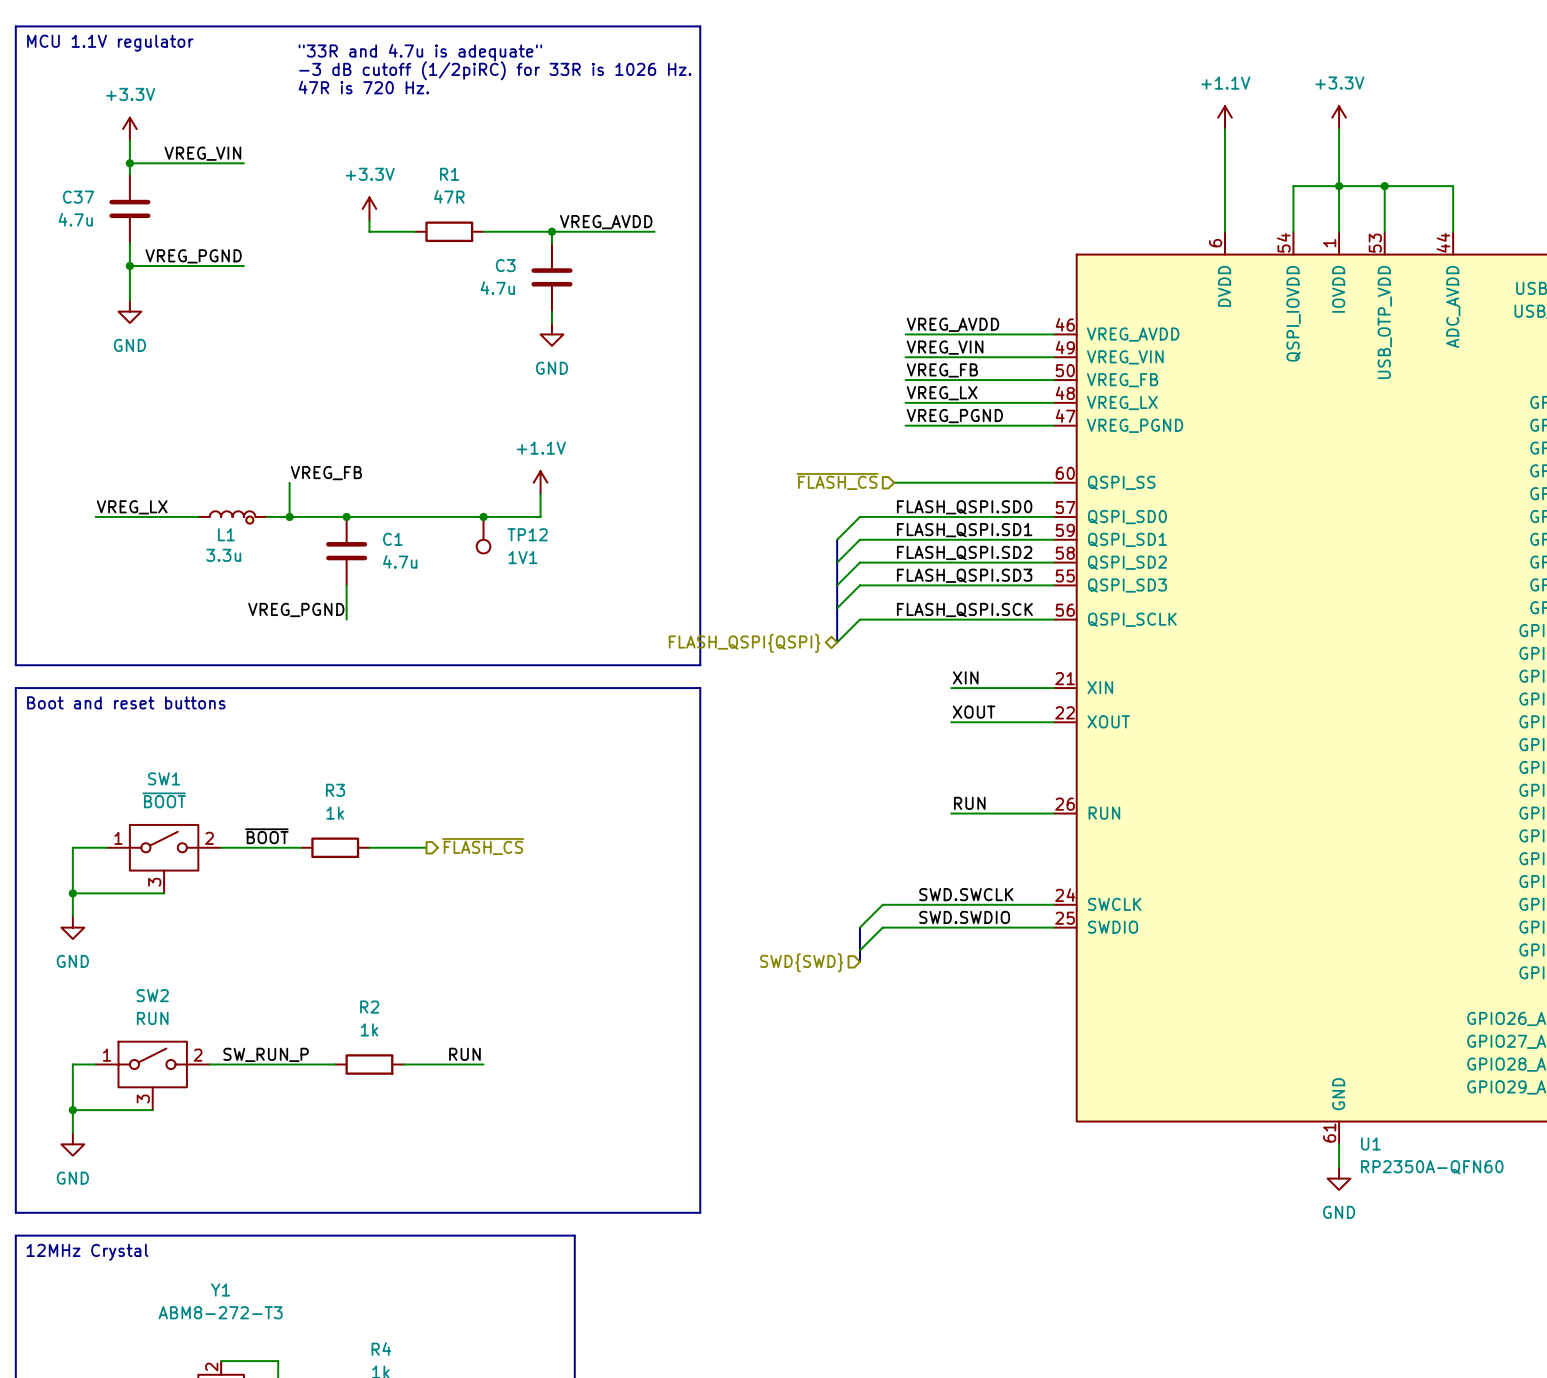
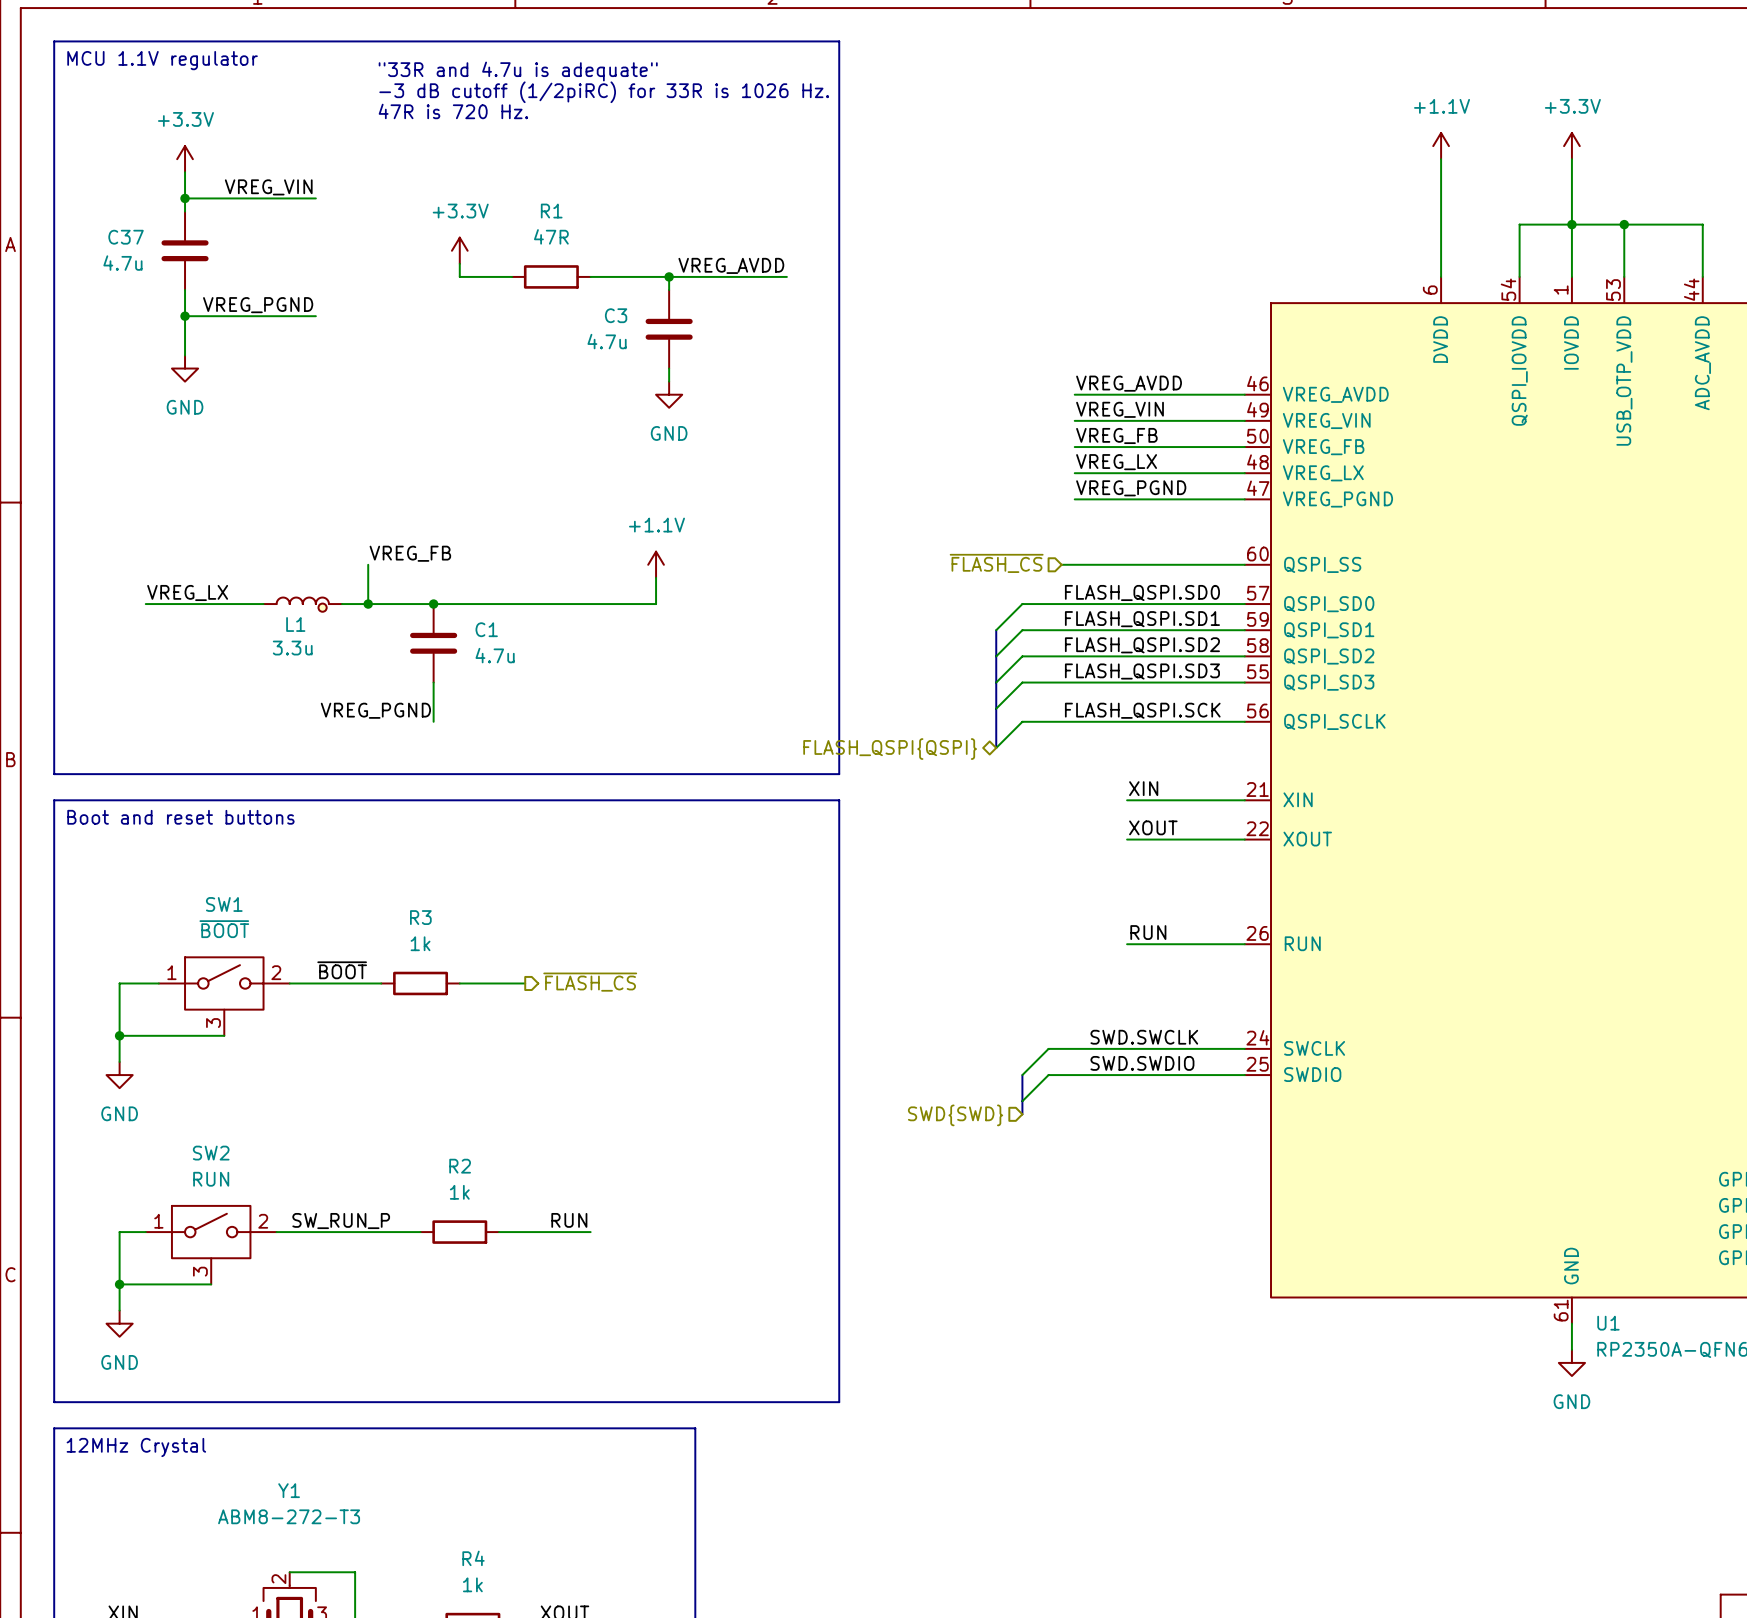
junction: (483, 516) -> none
TP12: 1V1 (483, 535) -> none

